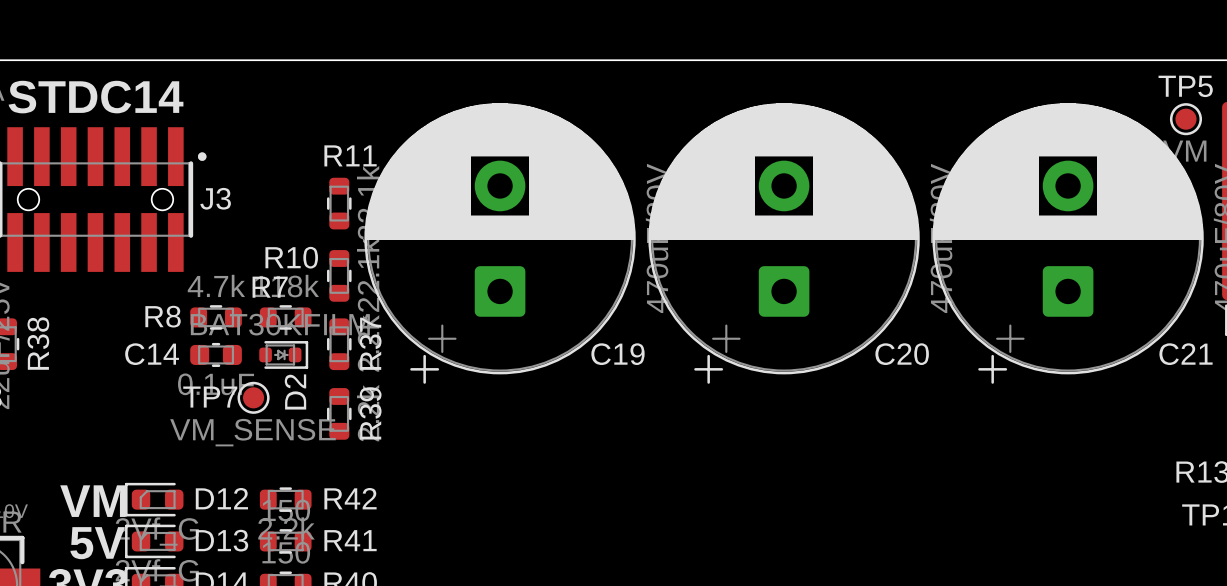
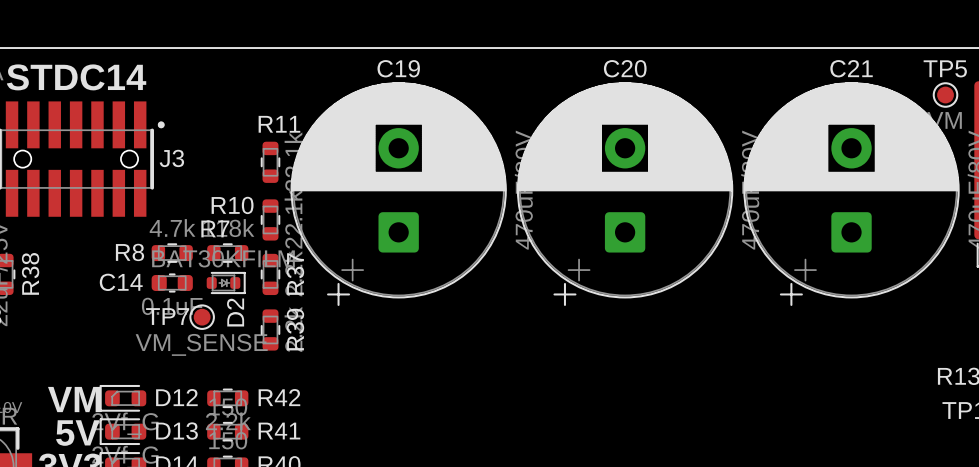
C19 name position: C19 (618, 354) -> C19 (398, 68)
C20 name position: C20 (902, 354) -> C20 (625, 68)
C21 name position: C21 (1186, 354) -> C21 (851, 68)

